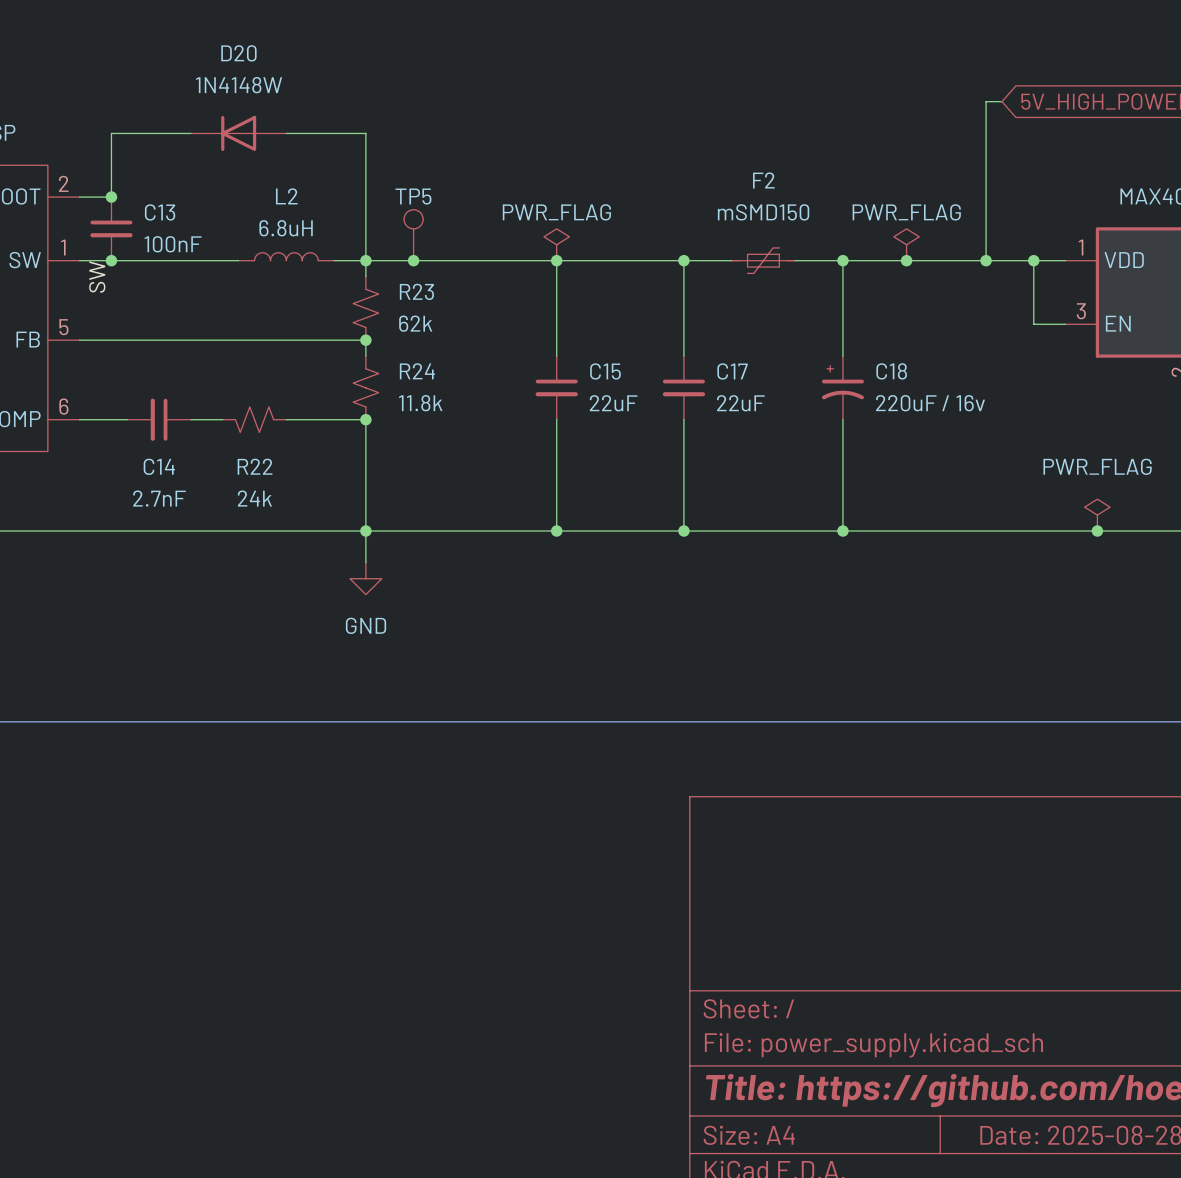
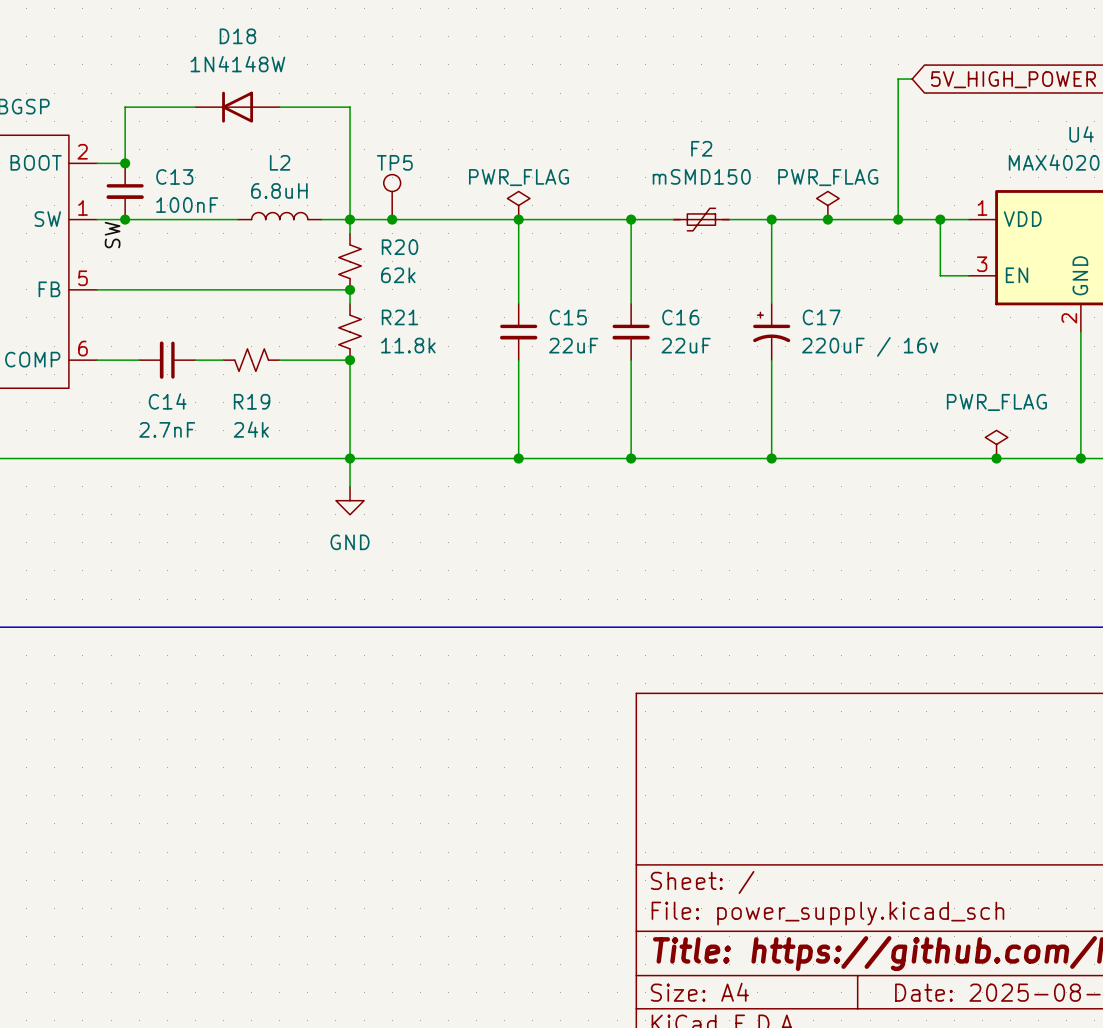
D20 name: D20 (238, 53) -> D18 (237, 36)
R23 name: R23 (416, 291) -> R20 (399, 247)
R24 name: R24 (417, 371) -> R21 (399, 317)
C17 name: C17 (732, 371) -> C16 (680, 317)
C18 name: C18 (891, 371) -> C17 (821, 317)
R22 name: R22 (255, 466) -> R19 (252, 401)

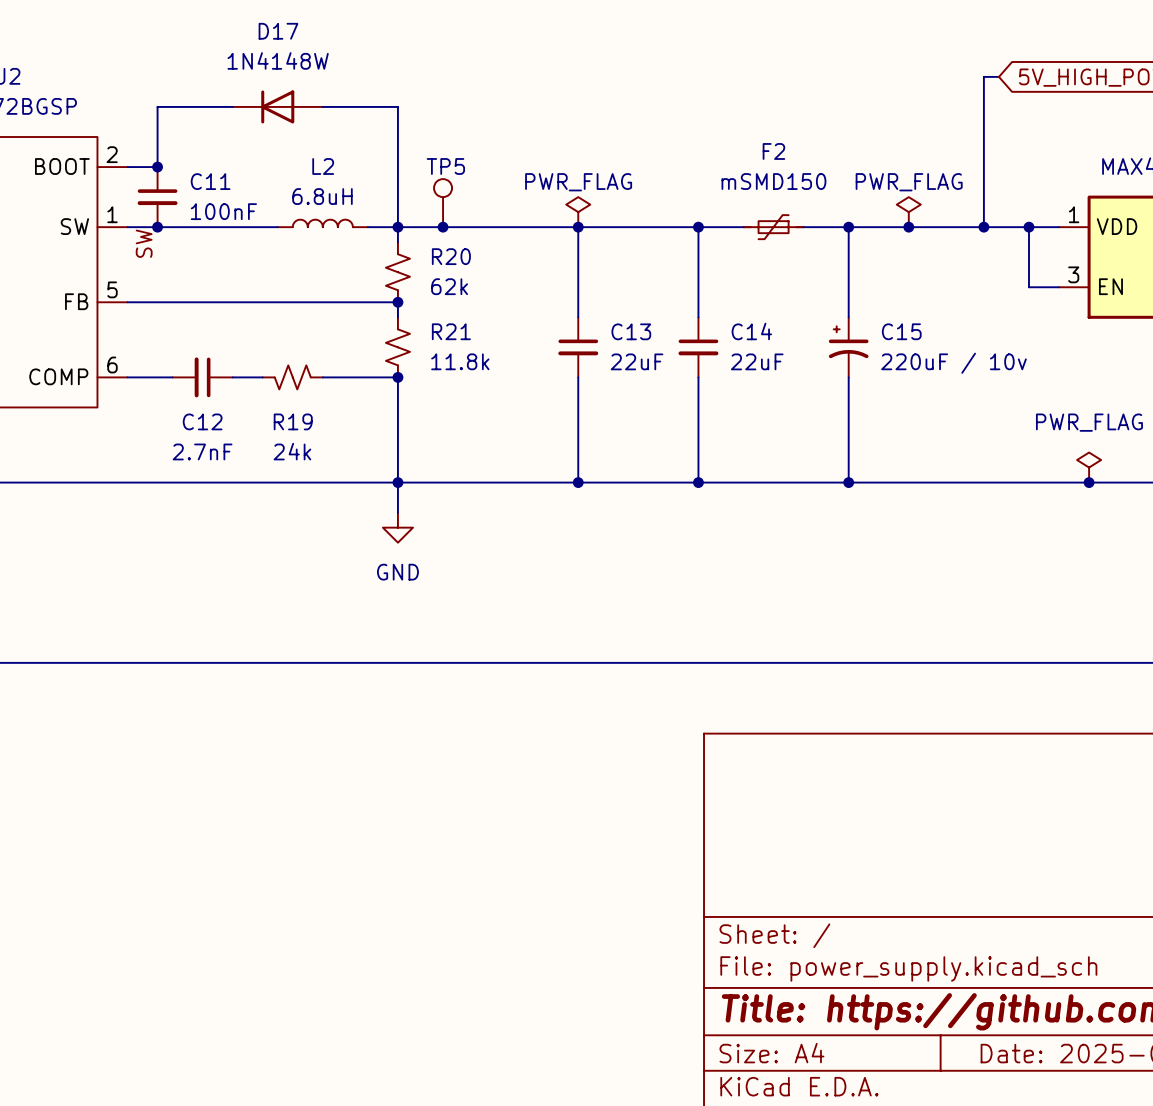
D18 name: D18 (237, 36) -> D17 (278, 31)
C13 name: C13 (174, 176) -> C11 (210, 181)
C15 name: C15 (568, 317) -> C13 (631, 331)
C16 name: C16 (680, 317) -> C14 (751, 331)
C17 name: C17 (821, 317) -> C15 (901, 331)
C17 value: 220uF / 16v (870, 346) -> 220uF / 10v (953, 363)
C14 name: C14 (167, 401) -> C12 (202, 421)

